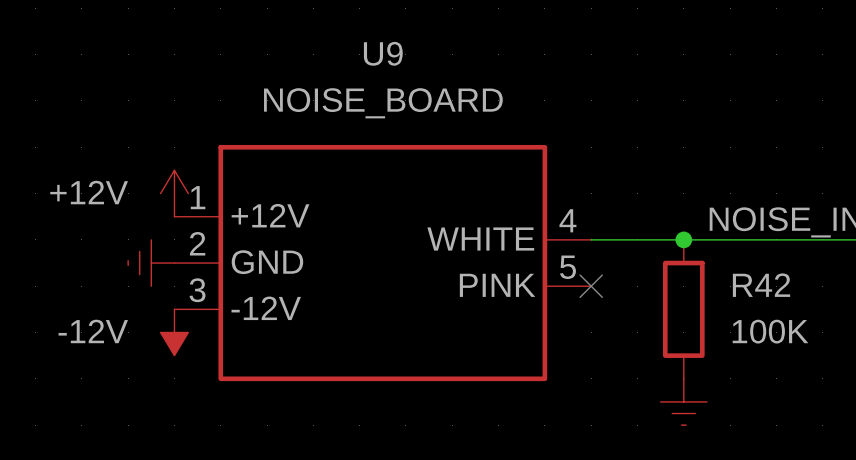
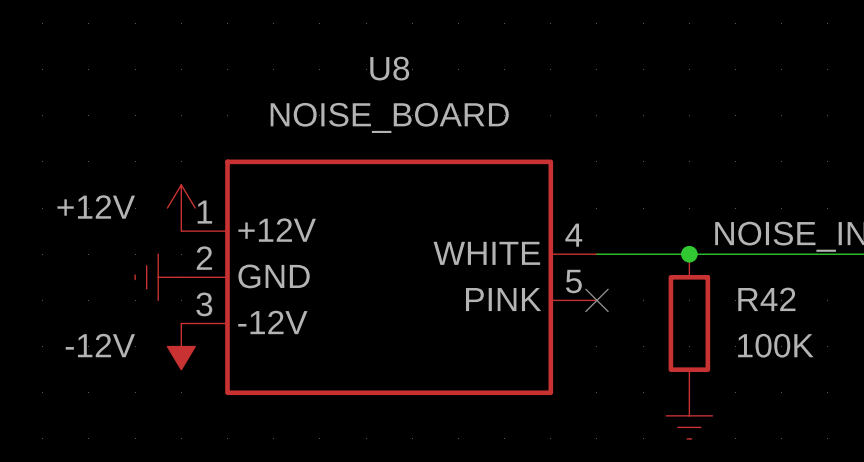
U9 name: U9 (383, 53) -> U8 (389, 68)

